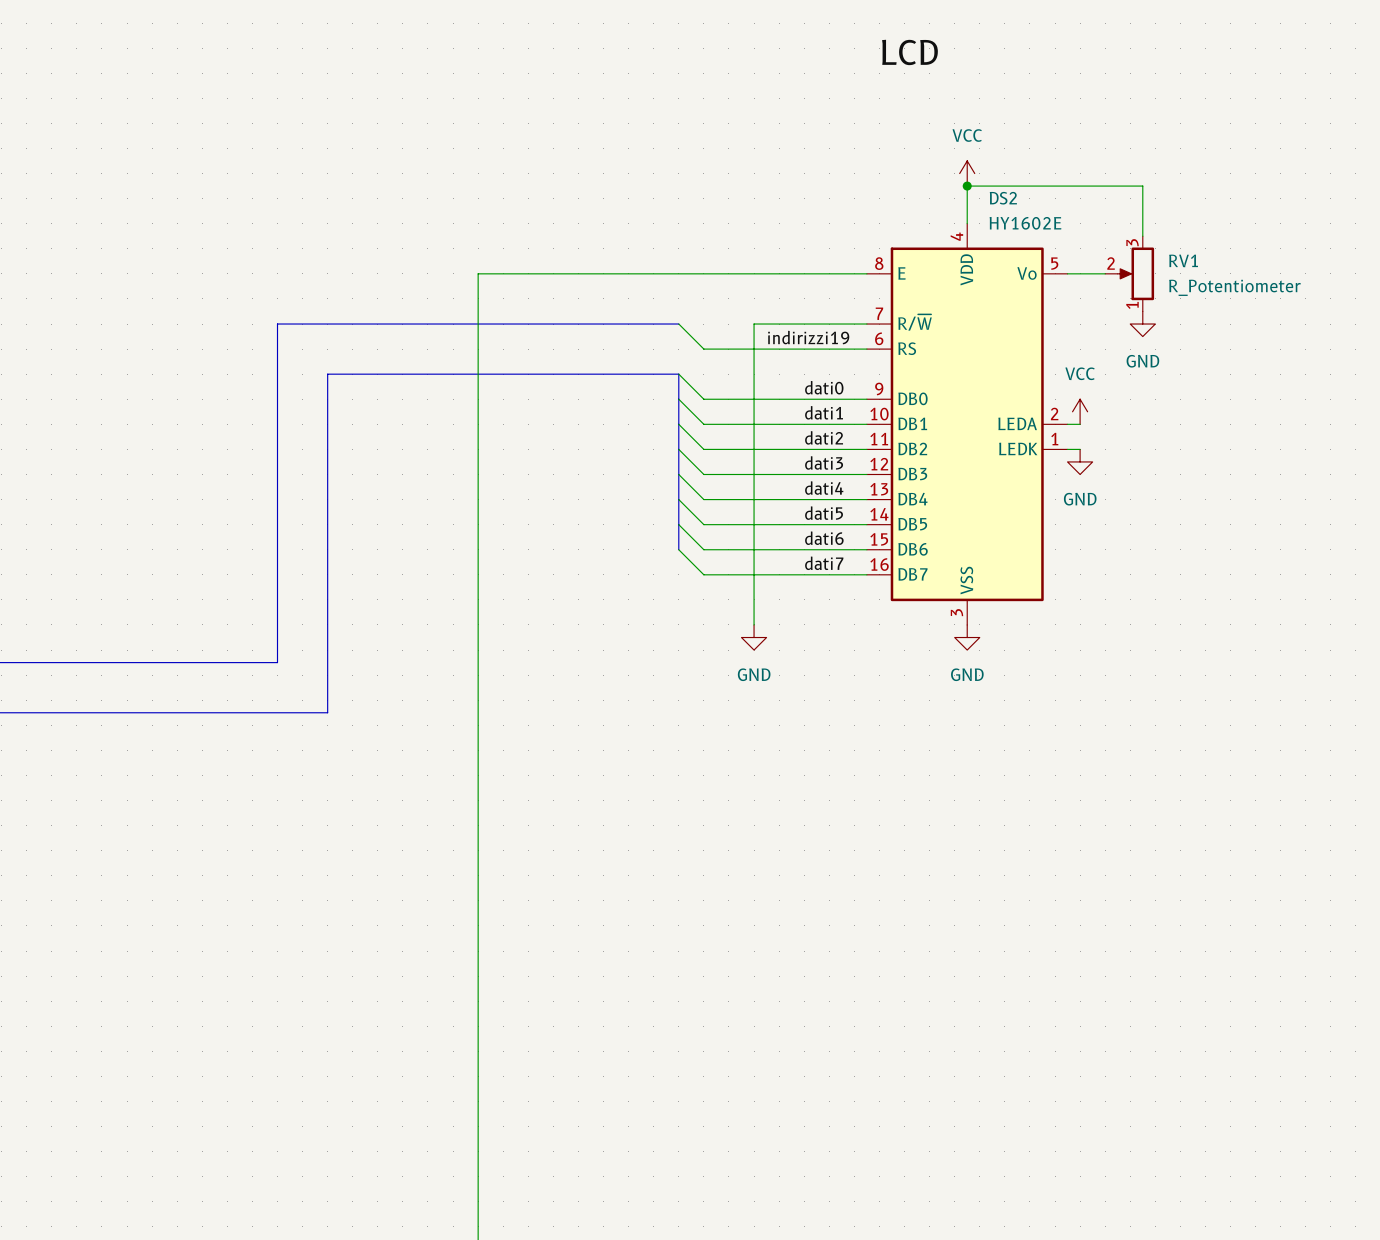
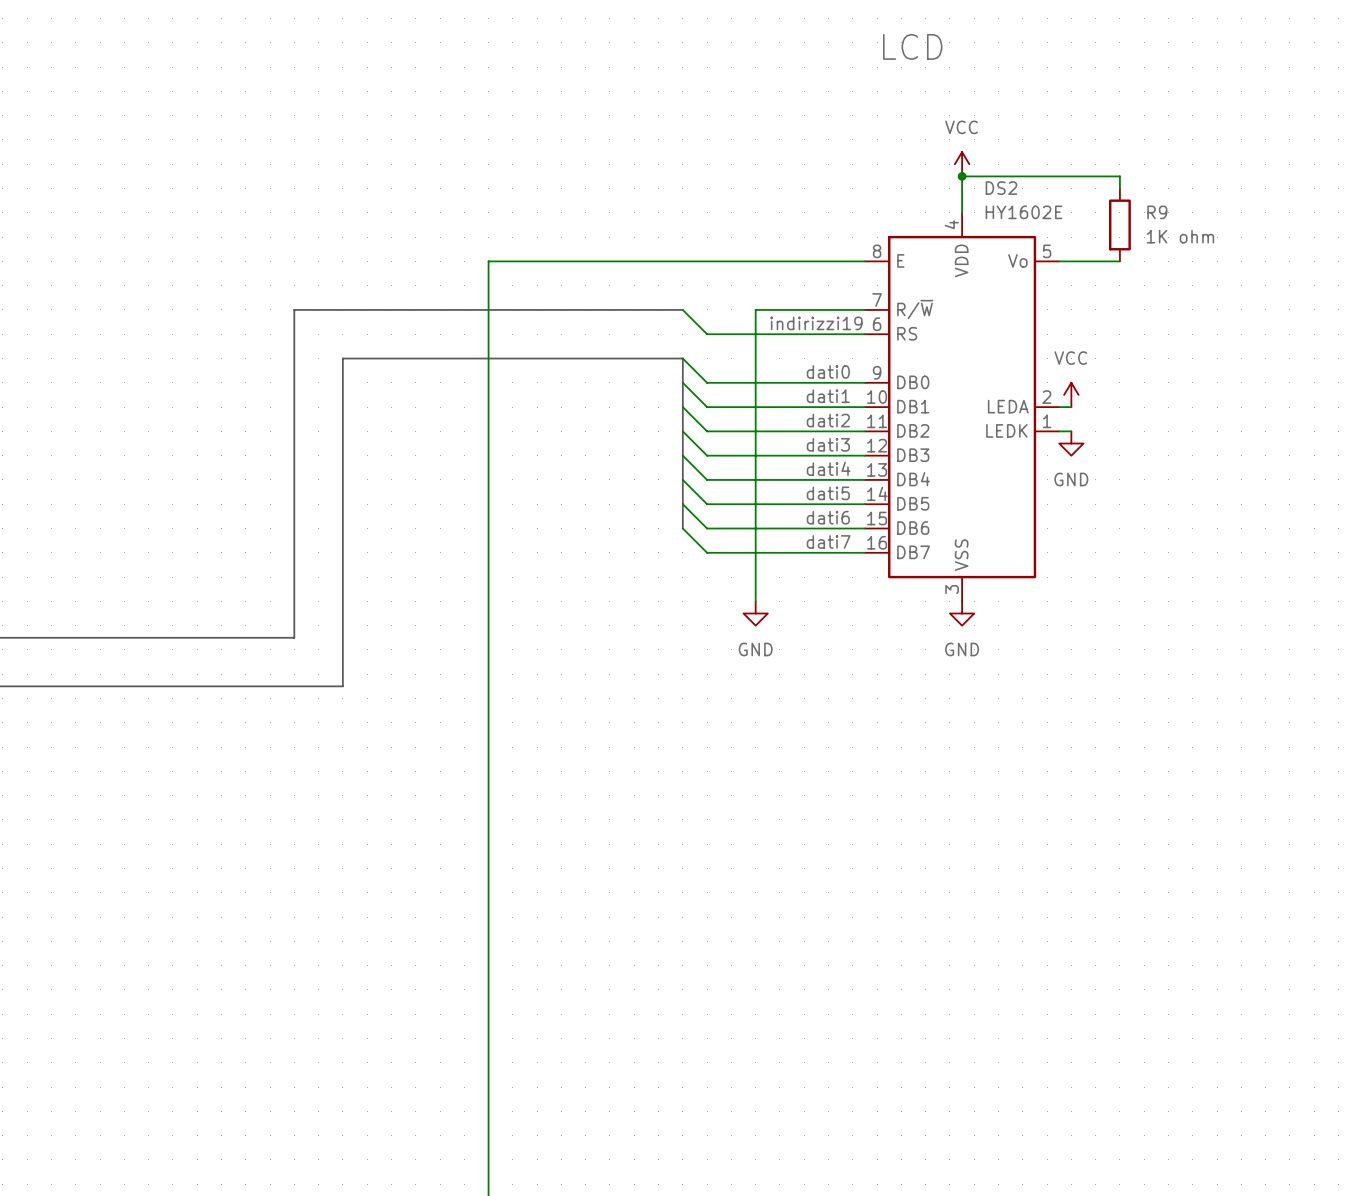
wire: (1130, 186) (1142, 186) (1142, 236) -> (1119, 176) (1119, 188)
R9: none -> 1K ohm (1119, 224)
RV1: R_Potentiometer (1129, 273) -> none
power symbol: GND (1142, 324) -> none

